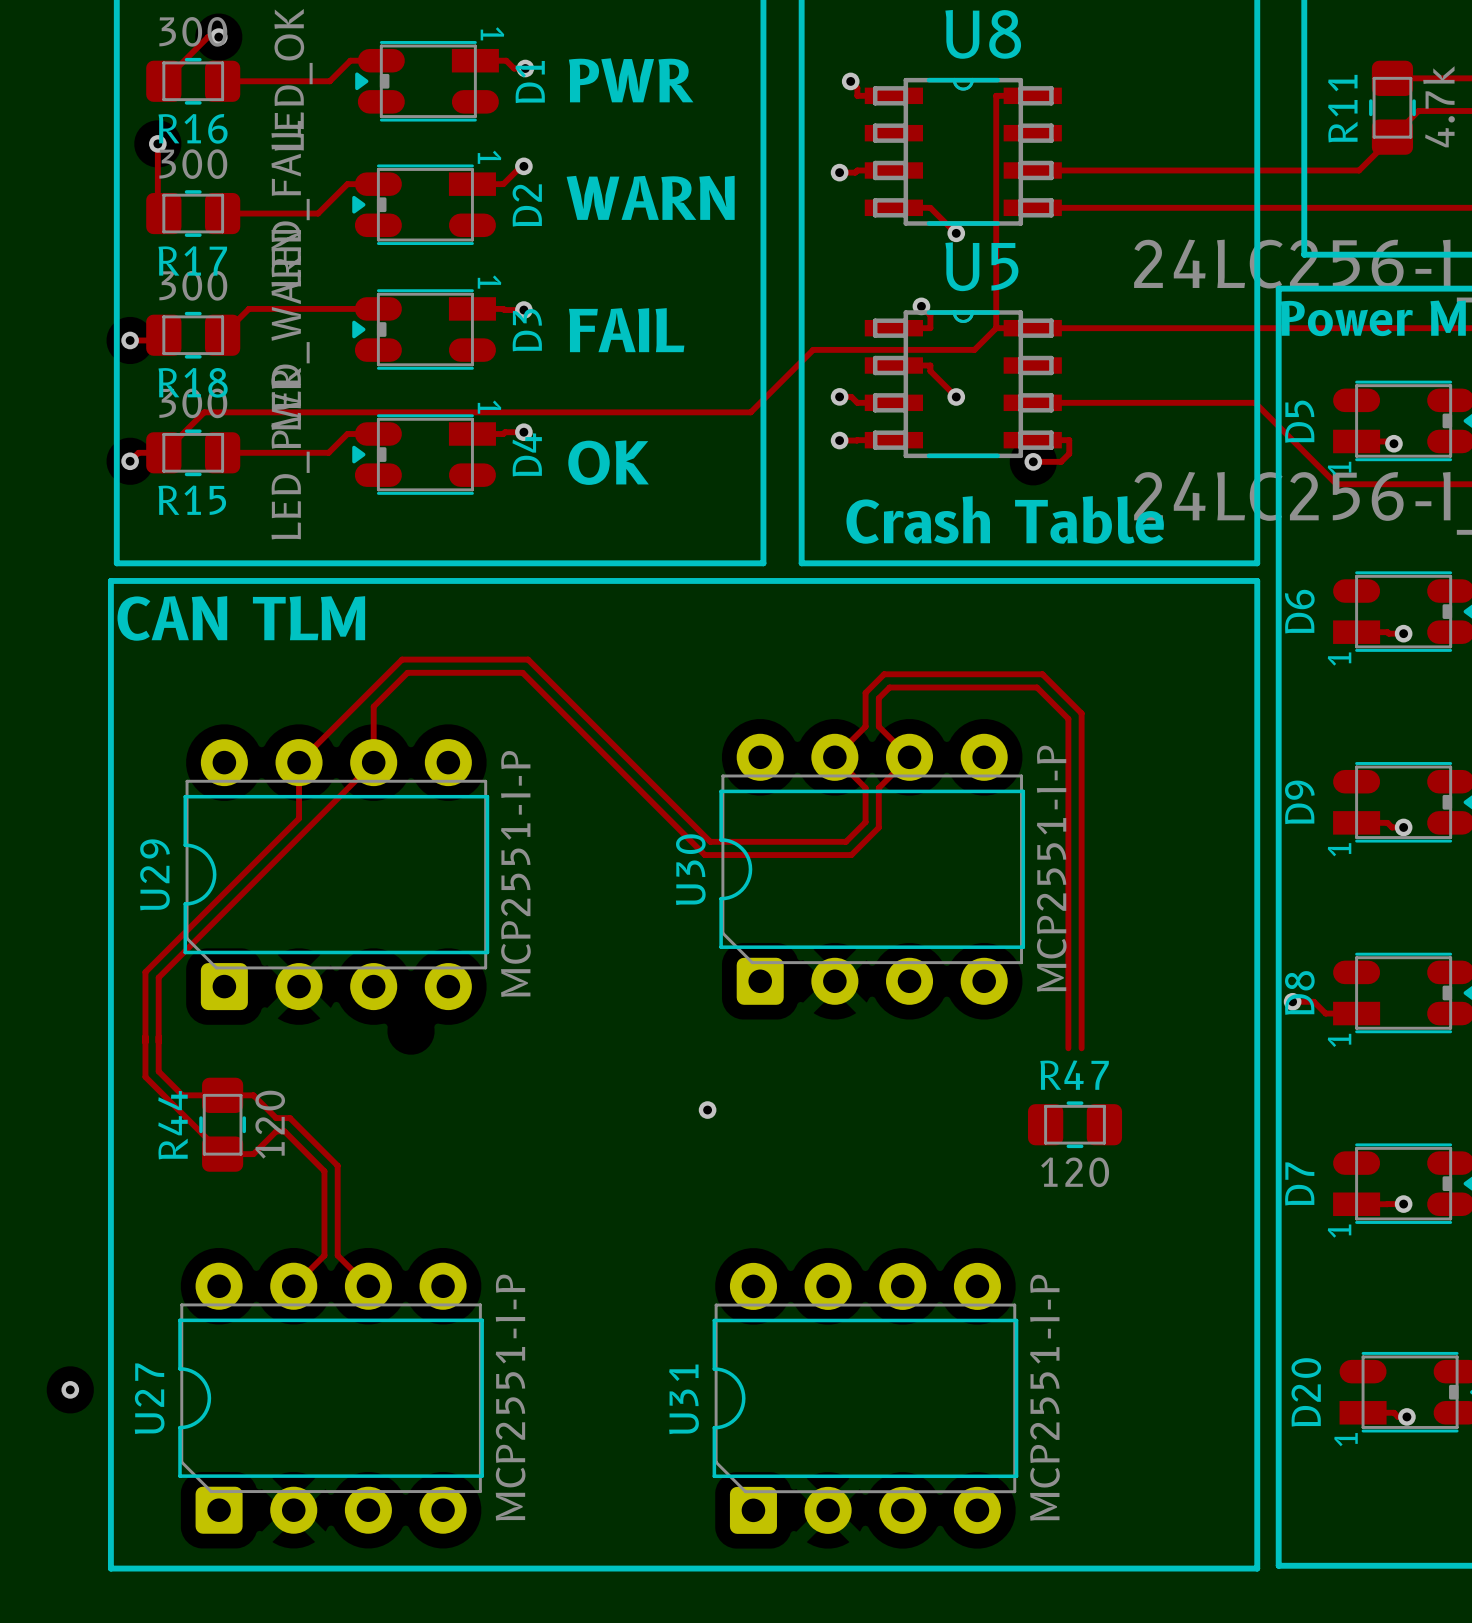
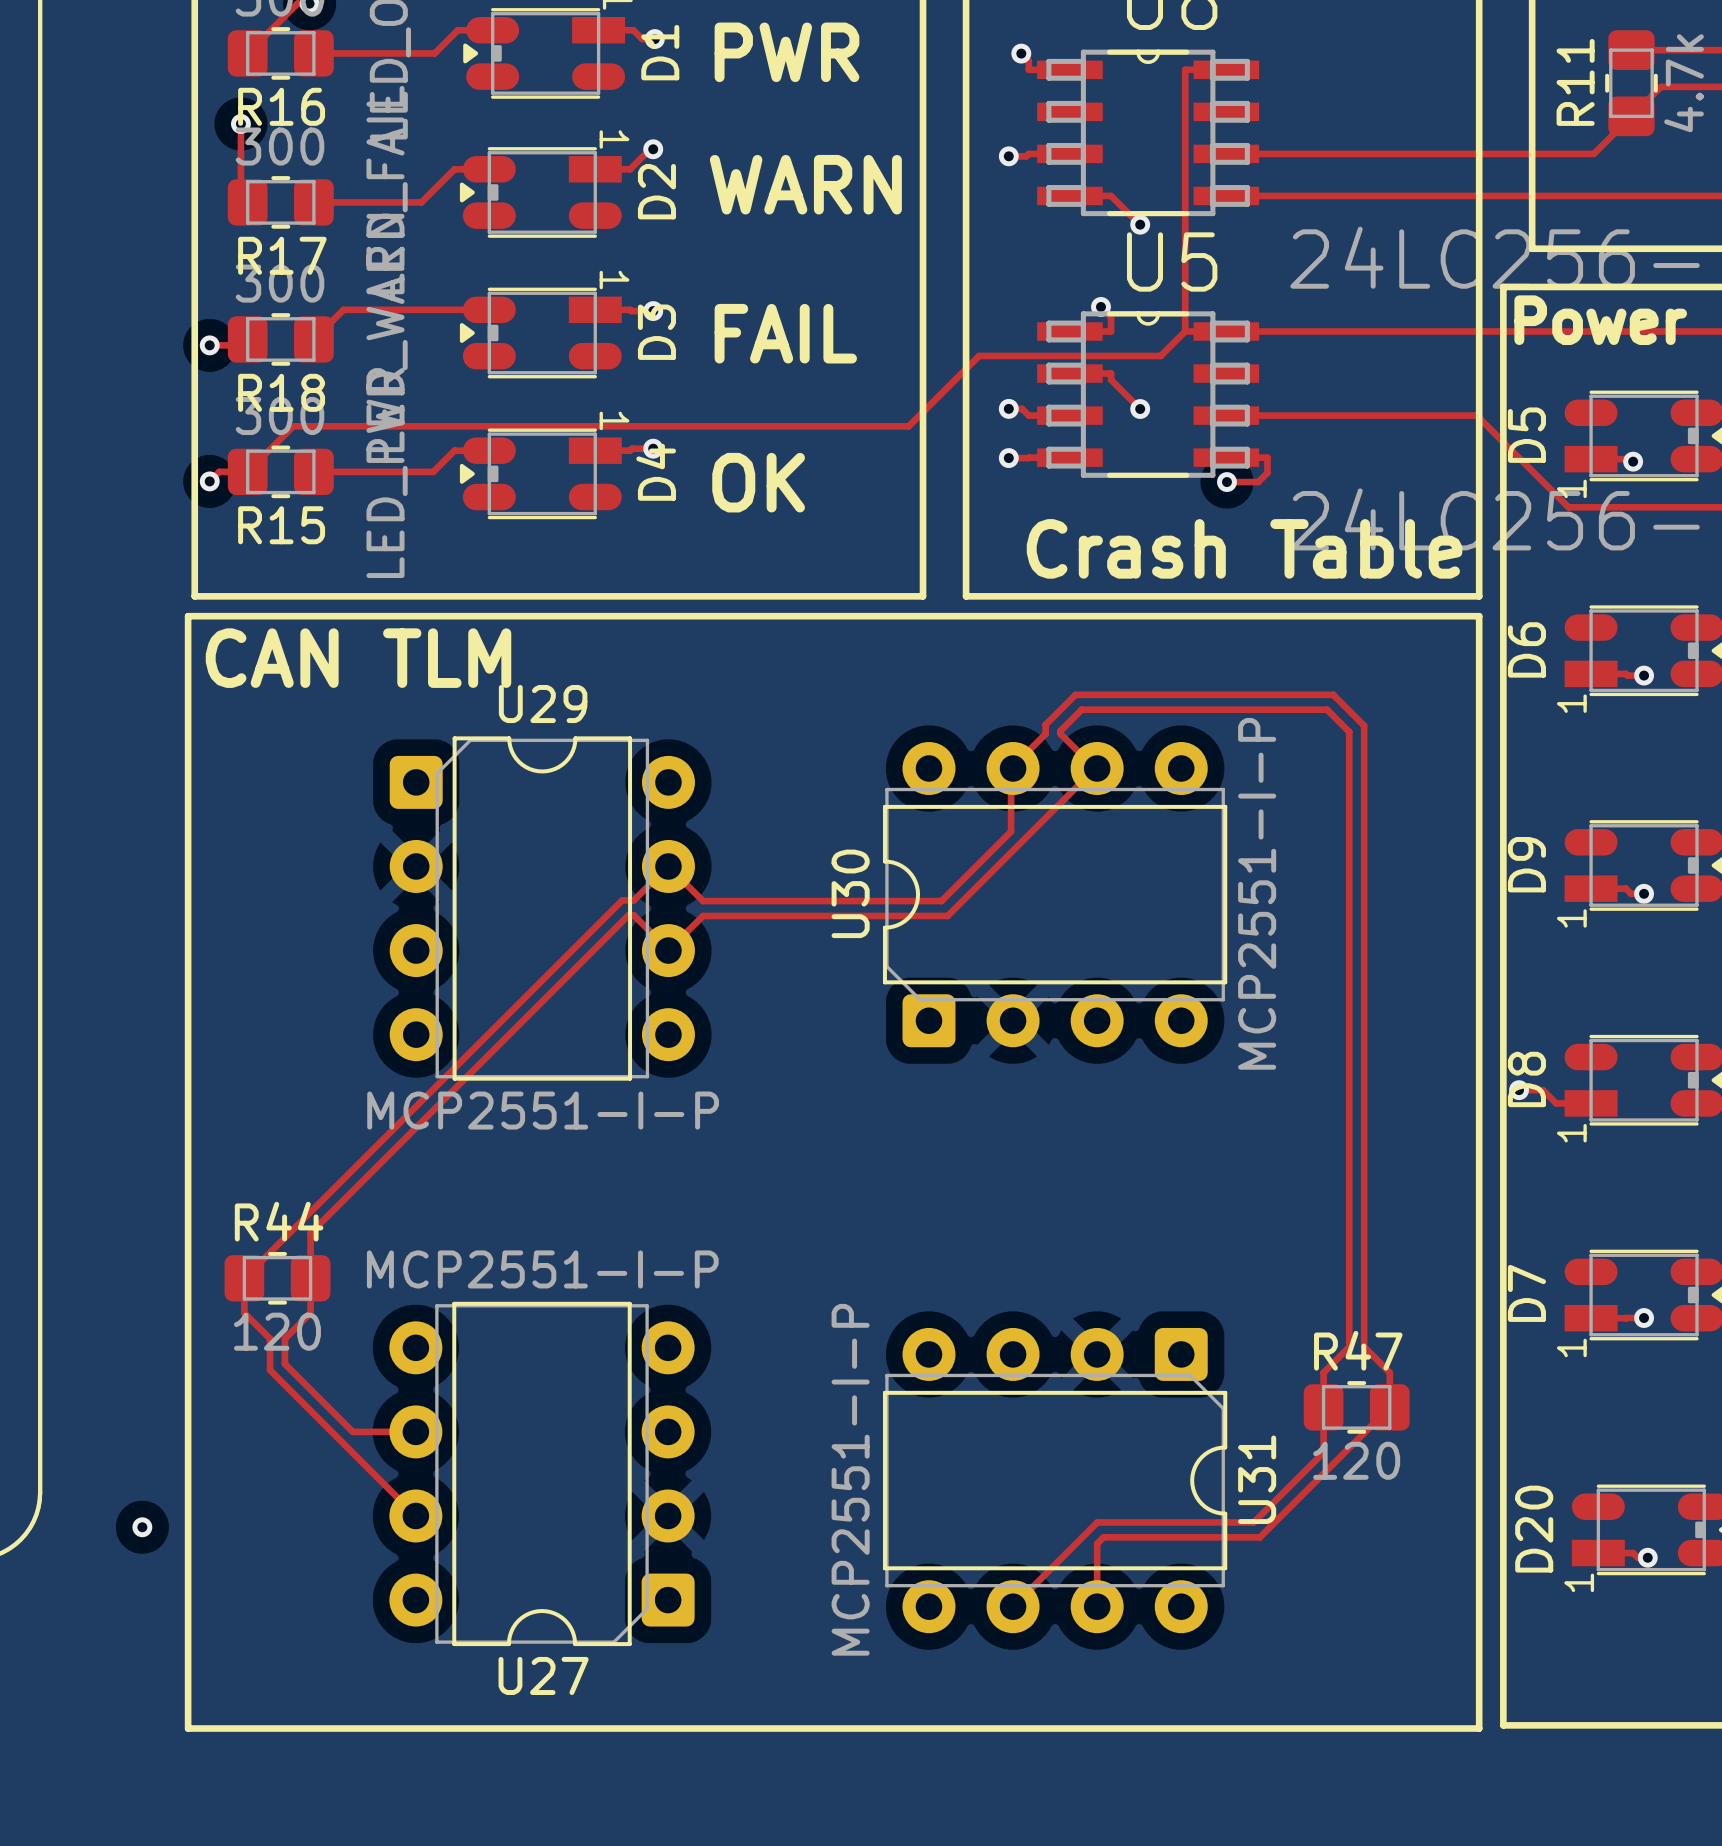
top track: none -> (668, 865) (633, 900) (622, 900) (244, 1278) (244, 1313) (270, 1338) (270, 1370) (415, 1515)
top track: none -> (668, 866) (703, 901) (941, 901) (1011, 831) (1011, 768) (1045, 733) (1045, 724) (1075, 694) (1333, 694) (1364, 725) (1364, 1346) (1389, 1372) (1389, 1407) (1259, 1537) (1103, 1537) (1097, 1543) (1097, 1606)
U30 position: (872, 869) -> (1055, 894)
U29 rotation: 0° (336, 874) -> 90° clockwise (542, 908)
top track: none -> (668, 949) (633, 915) (628, 915) (310, 1233) (310, 1313) (284, 1338) (284, 1363) (352, 1431) (415, 1431)
top track: none -> (668, 950) (703, 915) (947, 915) (1095, 768) (1060, 733) (1060, 730) (1081, 709) (1327, 709) (1349, 731) (1349, 1346) (1323, 1372) (1323, 1452) (1253, 1522) (1097, 1522) (1013, 1606)
top track: (1068, 1048) (1068, 718) (1037, 687) (889, 687) (878, 698) (878, 726) (909, 757) (878, 788) (878, 827) (851, 855) (704, 855) (522, 672) (407, 672) (373, 706) (373, 762) (158, 977) (158, 1071) (182, 1095) (253, 1095) (276, 1118) (290, 1118) (337, 1165) (337, 1255) (368, 1286) -> none
top track: (1081, 1048) (1081, 713) (1042, 674) (884, 674) (865, 692) (865, 726) (834, 757) (865, 788) (865, 822) (845, 841) (710, 841) (528, 659) (402, 659) (299, 762) (299, 818) (145, 972) (145, 1076) (222, 1154) (253, 1154) (276, 1131) (284, 1131) (324, 1171) (324, 1255) (293, 1286) -> none
via: (707, 1110) -> none
R44 rotation: 0° (222, 1124) -> 90° clockwise (277, 1278)
R47 position: (1075, 1124) -> (1356, 1407)
U27 rotation: 0° (331, 1398) -> 90° counterclockwise (541, 1473)
U31 rotation: 0° (865, 1398) -> 180° (1055, 1480)

